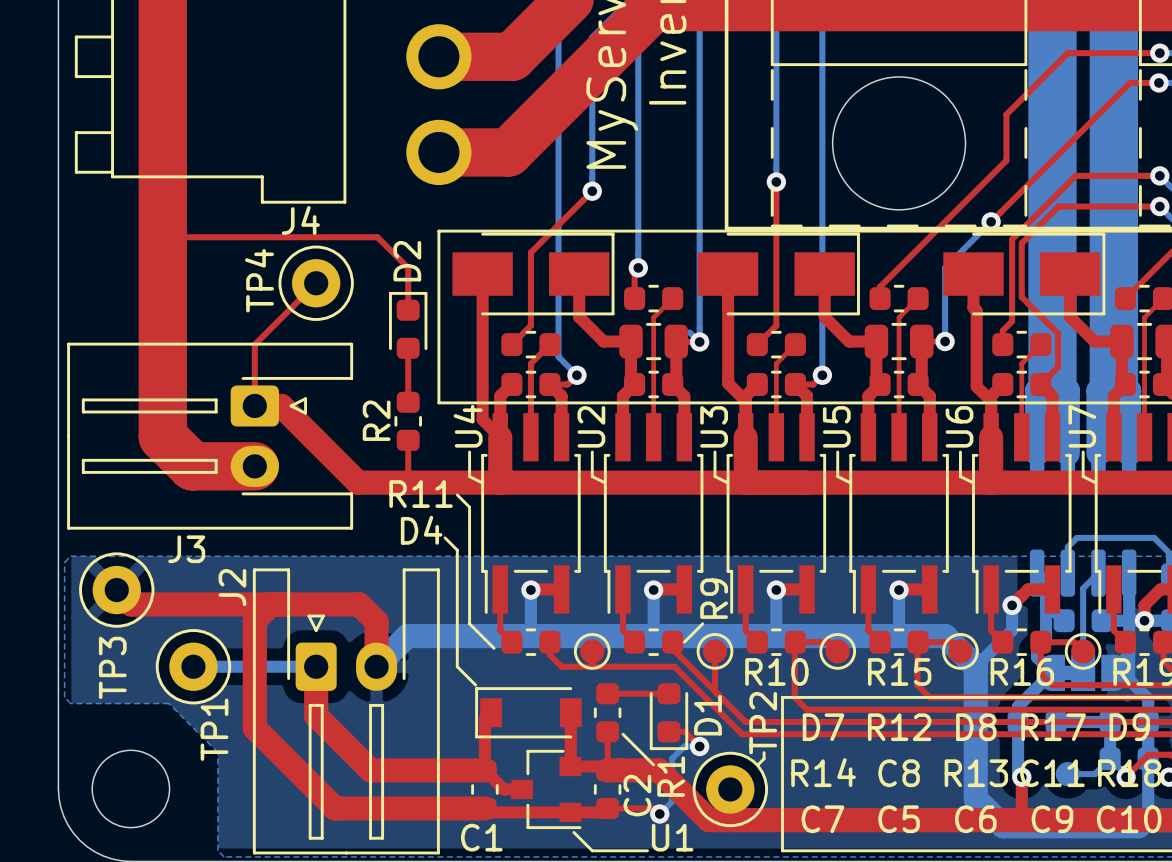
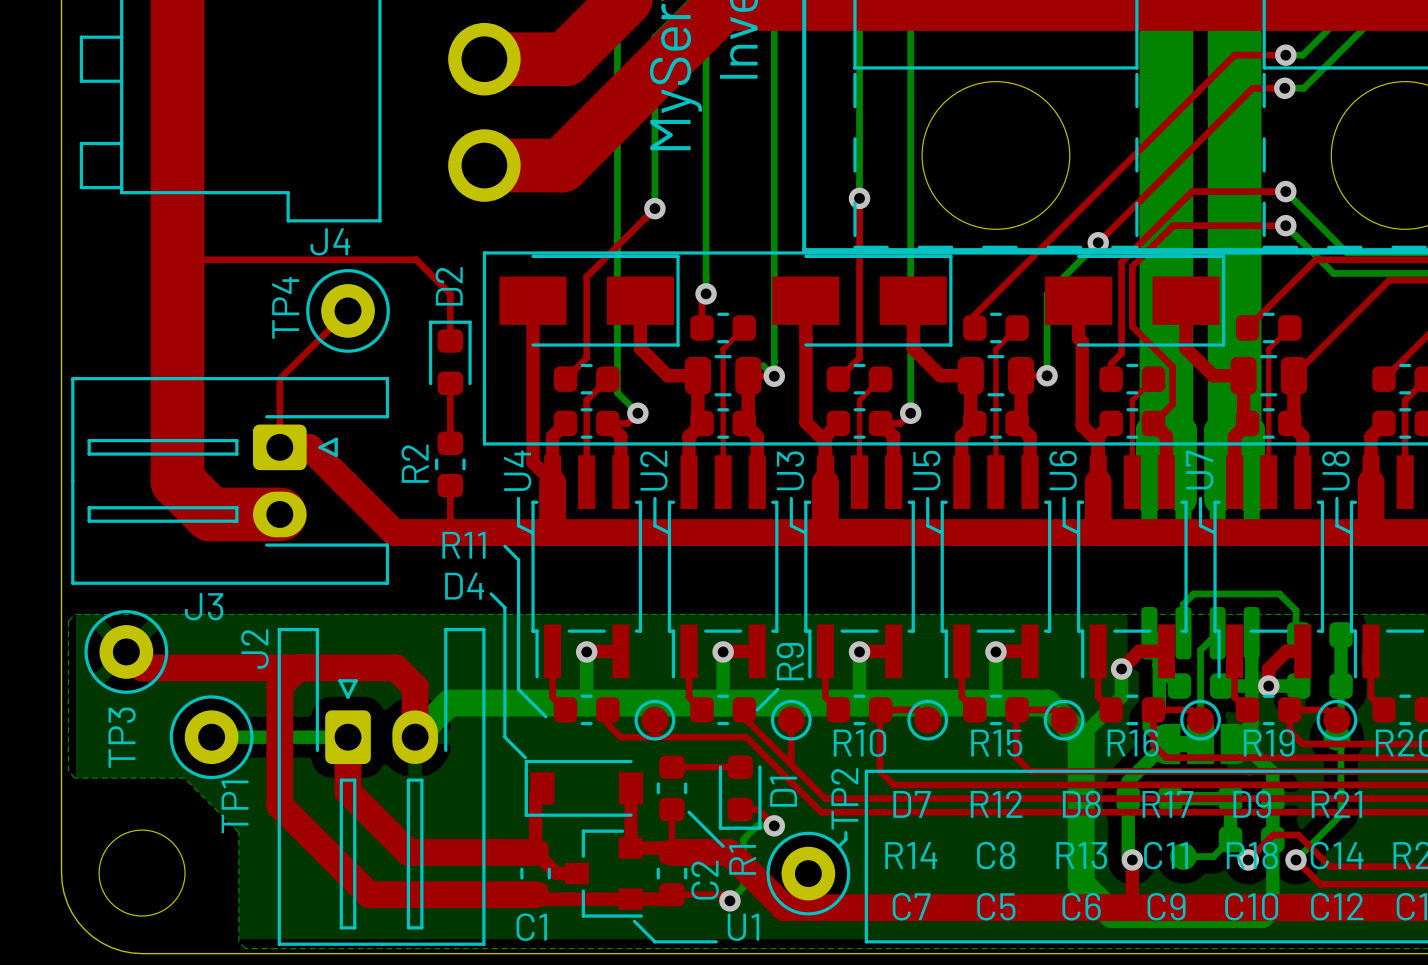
top track: (1113, 53) (1067, 53) (1006, 114) (1006, 160) -> (1234, 55) (1115, 174)

